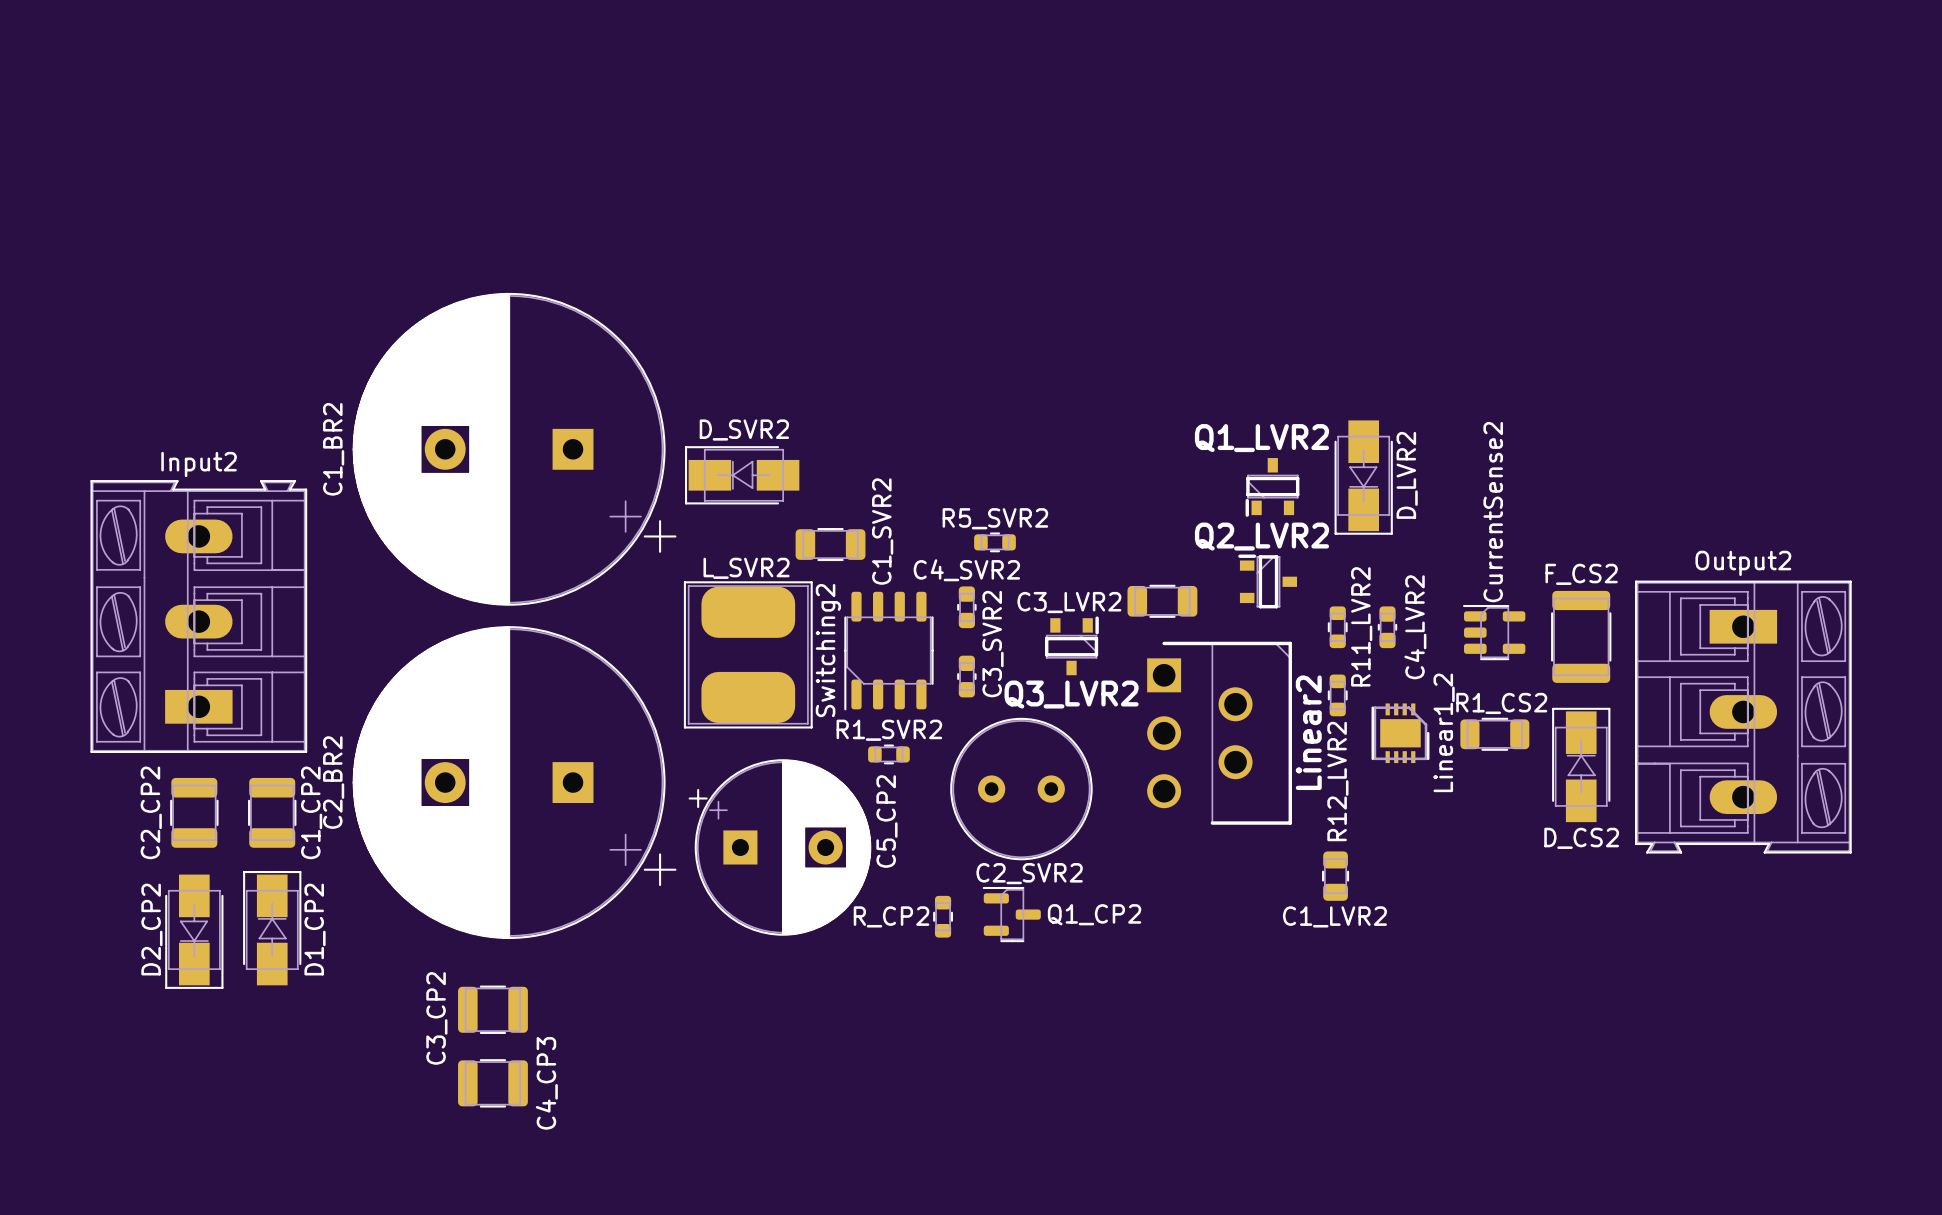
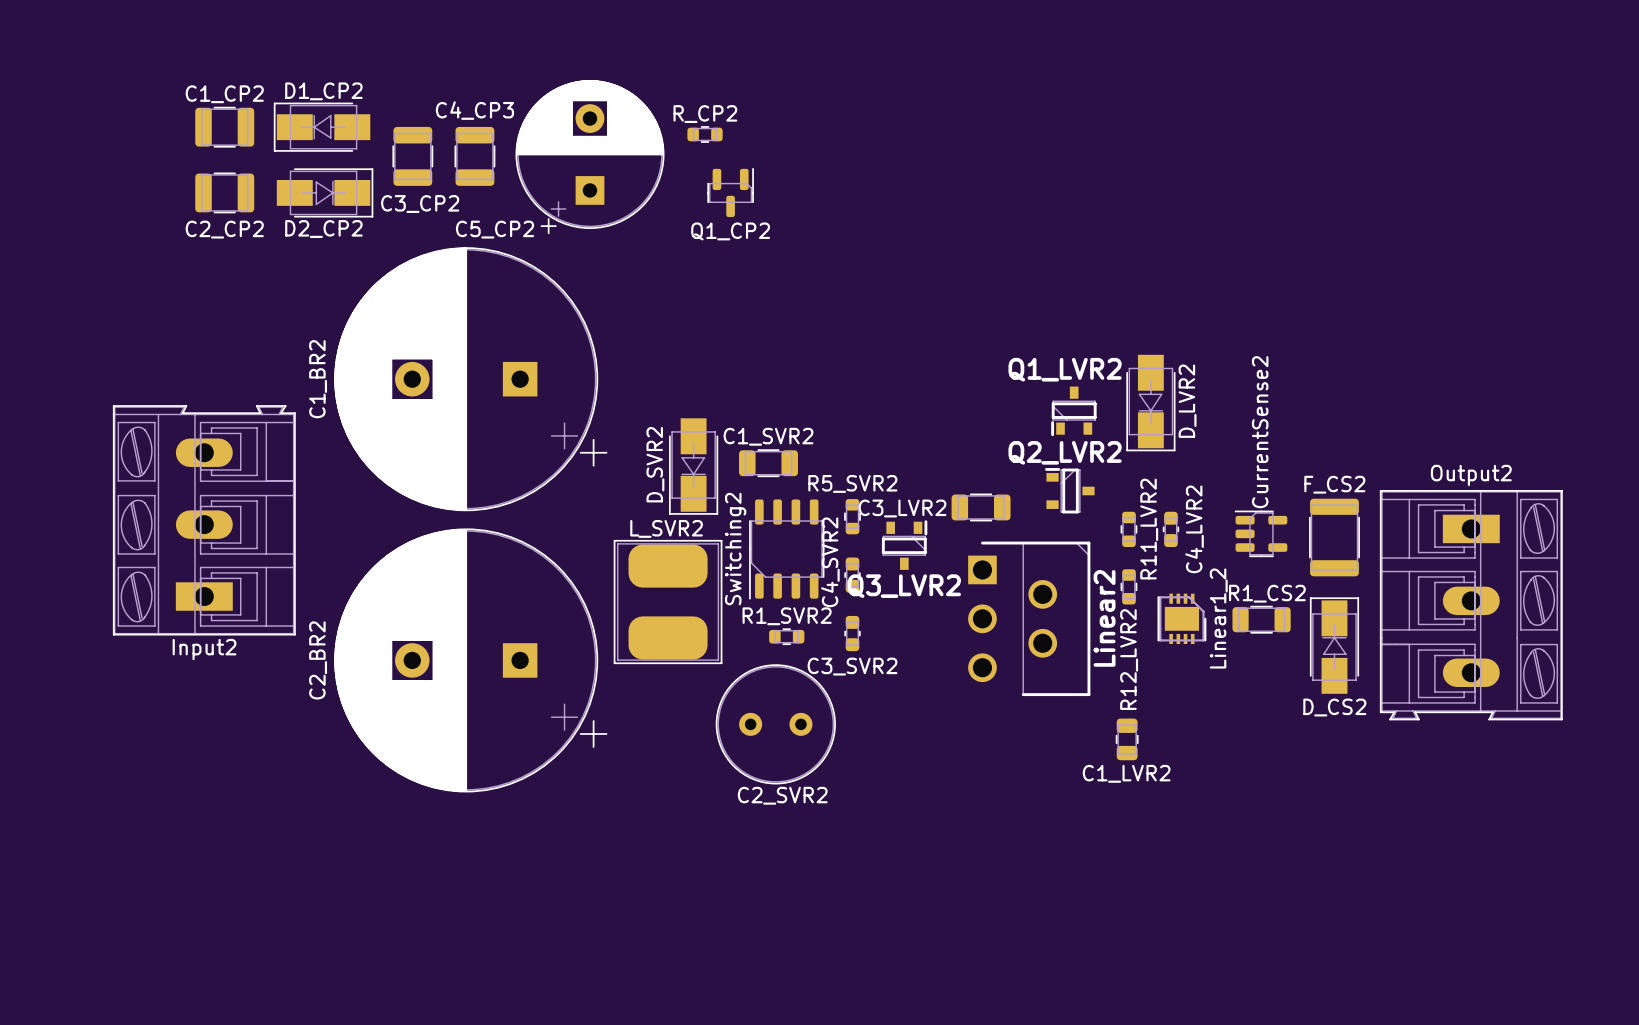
C1_BR2 position: (514, 449) -> (470, 379)
Input2 name position: Input2 (199, 464) -> Input2 (204, 649)
D_SVR2 rotation: 0° (742, 475) -> 90° counterclockwise (693, 466)
D_SVR2 position: (742, 475) -> (693, 466)
C1_SVR2 name rotation: 0° (882, 531) -> 90° clockwise (768, 436)
R5_SVR2 rotation: 0° (994, 542) -> 90° clockwise (852, 516)
R5_SVR2 position: (994, 542) -> (852, 516)
C1_SVR2 position: (830, 544) -> (768, 463)
C4_SVR2 name rotation: 0° (966, 570) -> 90° counterclockwise (830, 562)
C4_SVR2 position: (966, 607) -> (852, 575)
Input2 position: (198, 616) -> (204, 520)
C3_SVR2 name rotation: 0° (993, 644) -> 90° clockwise (852, 666)
Switching2 position: (888, 651) -> (786, 549)
L_SVR2 position: (748, 654) -> (668, 602)
C3_SVR2 position: (966, 676) -> (852, 633)
R1_SVR2 position: (888, 754) -> (786, 636)
C2_BR2 position: (514, 782) -> (470, 660)
C2_SVR2 position: (1021, 789) -> (775, 724)
C2_CP2 name position: C2_CP2 (151, 812) -> C2_CP2 (224, 229)
C2_CP2 rotation: 0° (194, 812) -> 90° clockwise (224, 192)
C2_CP2 position: (194, 812) -> (224, 192)
C1_CP2 rotation: 0° (272, 812) -> 90° clockwise (224, 127)
C1_CP2 position: (272, 812) -> (224, 127)
C1_CP2 name position: C1_CP2 (311, 812) -> C1_CP2 (224, 94)
C5_CP2 name position: C5_CP2 (886, 821) -> C5_CP2 (495, 229)
C5_CP2 rotation: 0° (779, 847) -> 90° counterclockwise (589, 157)
C5_CP2 position: (779, 847) -> (589, 157)
Q1_CP2 rotation: 0° (1011, 914) -> 90° clockwise (730, 192)
Q1_CP2 position: (1011, 914) -> (730, 192)
Q1_CP2 name position: Q1_CP2 (1094, 914) -> Q1_CP2 (730, 231)
R_CP2 rotation: 0° (943, 916) -> 90° clockwise (705, 134)
R_CP2 position: (943, 916) -> (705, 134)
D1_CP2 rotation: 0° (272, 928) -> 90° counterclockwise (322, 127)
D1_CP2 position: (272, 928) -> (322, 127)
D2_CP2 rotation: 0° (194, 931) -> 90° counterclockwise (325, 192)
D2_CP2 position: (194, 931) -> (325, 192)
C3_CP2 rotation: 0° (492, 1009) -> 90° clockwise (412, 156)
C3_CP2 position: (492, 1009) -> (412, 156)
C3_CP2 name position: C3_CP2 (436, 1018) -> C3_CP2 (420, 204)
C4_CP3 rotation: 0° (492, 1083) -> 90° clockwise (474, 156)
C4_CP3 position: (492, 1083) -> (474, 156)
C4_CP3 name position: C4_CP3 (546, 1083) -> C4_CP3 (474, 110)

